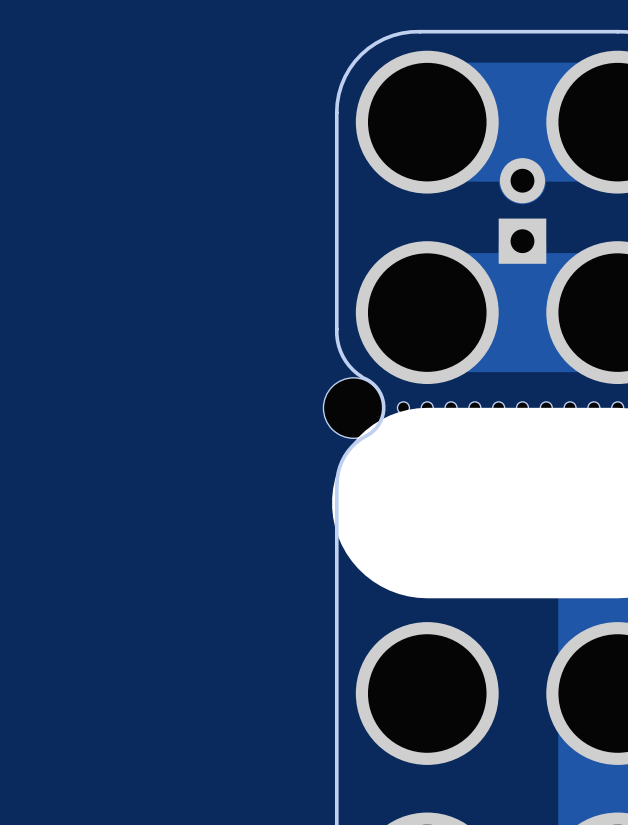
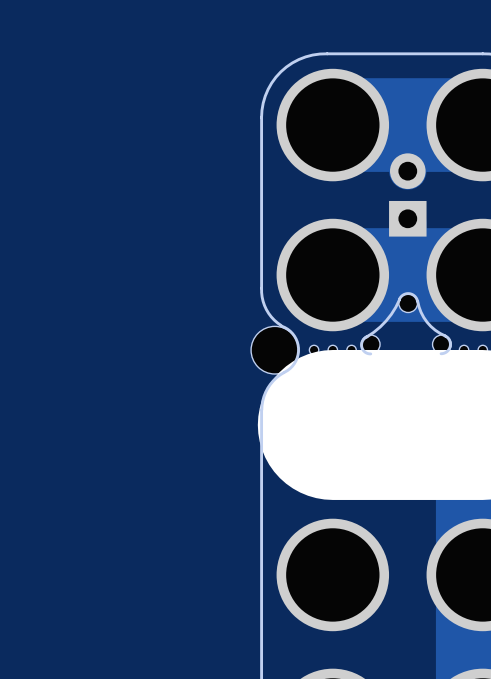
board edge: none -> (399, 299) (403, 294) (409, 293) (414, 296) (417, 301)
board edge: none -> (399, 299) (386, 320) (362, 340) (362, 349) (370, 353)
board edge: none -> (417, 301) (427, 322) (449, 340) (448, 349) (441, 353)
part: none -> (408, 303)
part footprint: [468, 401, 481, 414] -> [361, 335, 381, 354]
part footprint: [564, 401, 577, 414] -> [432, 335, 452, 354]
part: (498, 407) -> none
part: (522, 407) -> none
part: (546, 407) -> none

